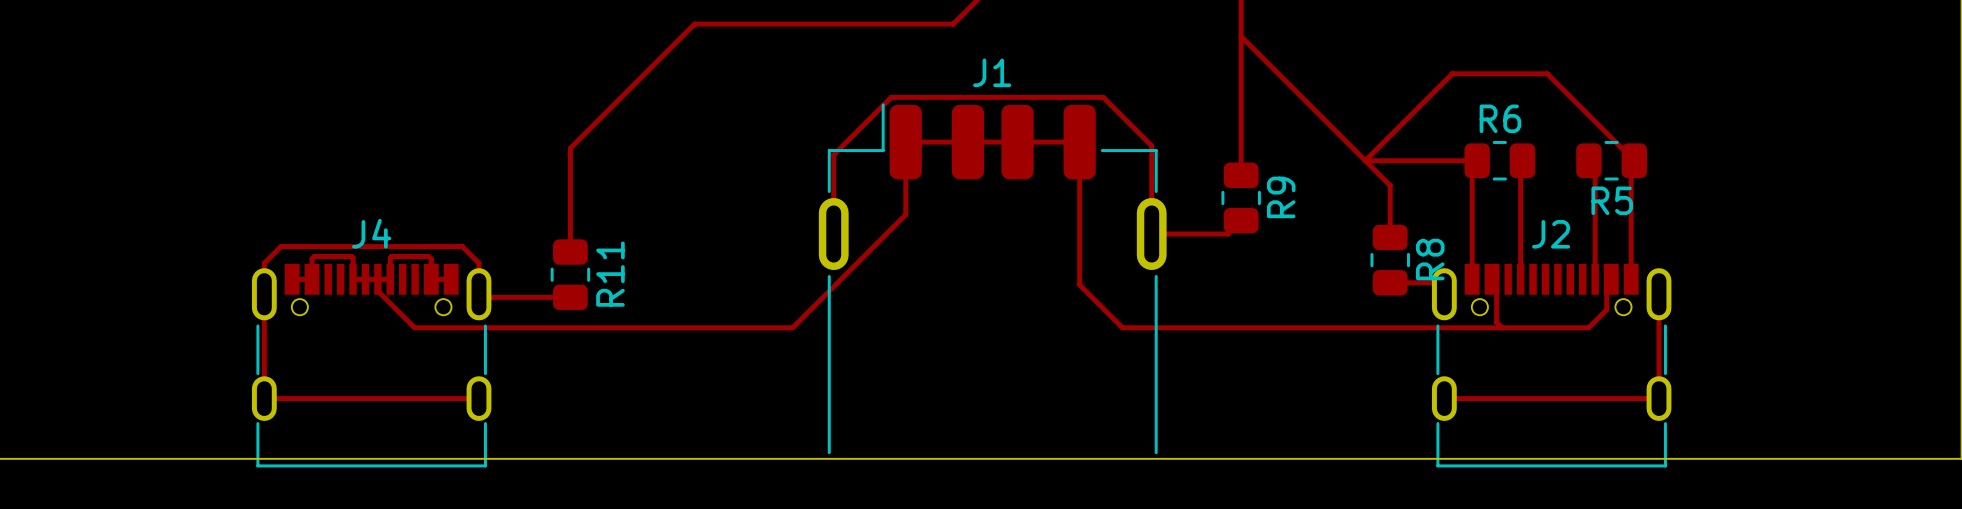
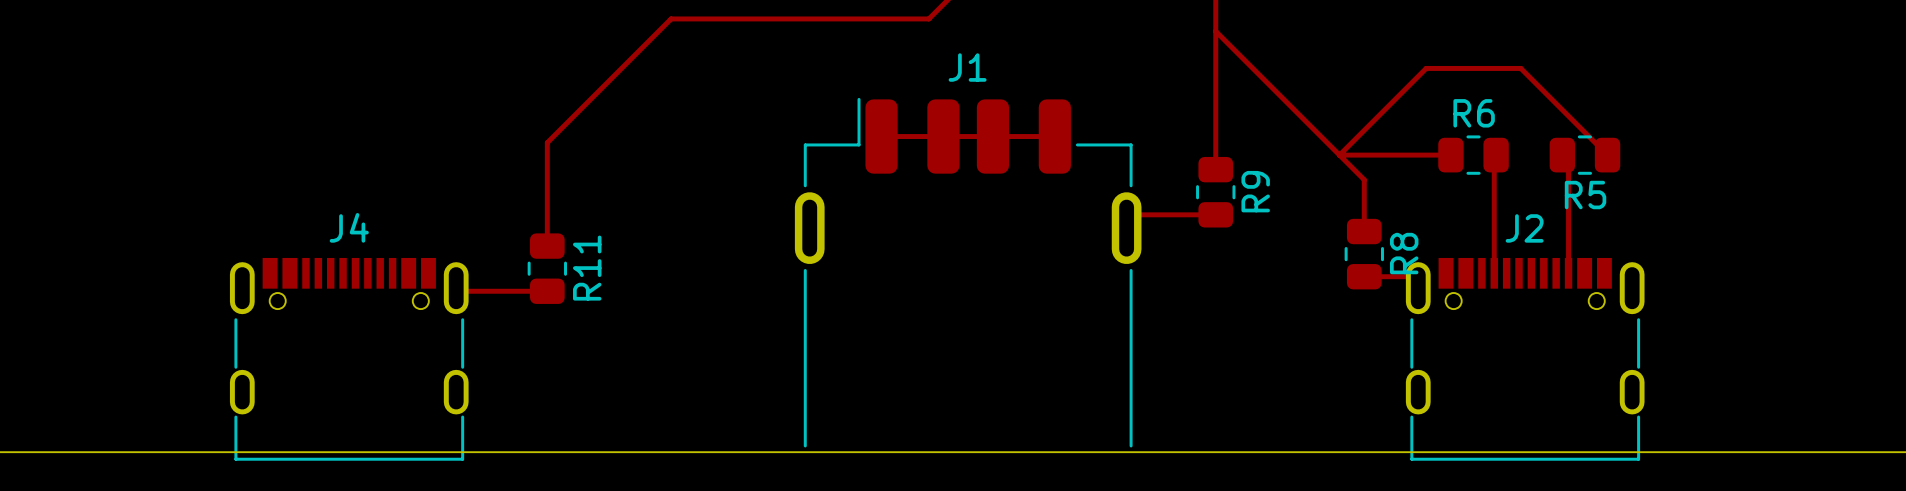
top track: (905, 142) (905, 214) (792, 327) (414, 327) (377, 291) (377, 279) -> none
top track: (1079, 142) (1079, 284) (1122, 327) (1588, 327) (1606, 309) (1606, 283) (1611, 279) -> none
top track: (1477, 160) (1472, 165) (1472, 279) -> none
top track: (1634, 160) (1631, 163) (1631, 279) -> none
top track: (1241, 220) (1227, 234) (1151, 234) (1151, 145) (1103, 97) (891, 97) (833, 154) (833, 234) -> (1215, 214) (1139, 214) (1126, 228)
top track: (292, 279) (312, 279) (312, 258) (314, 256) (351, 256) (353, 279) (390, 279) (391, 256) (428, 256) (431, 258) (431, 279) (451, 279) -> none
top track: (1492, 279) (1496, 283) (1496, 322) (1501, 327) -> none
top track: (478, 294) (478, 263) (462, 246) (280, 246) (264, 263) (264, 398) (478, 398) -> none
top track: (1659, 294) (1659, 398) (1444, 398) -> none

